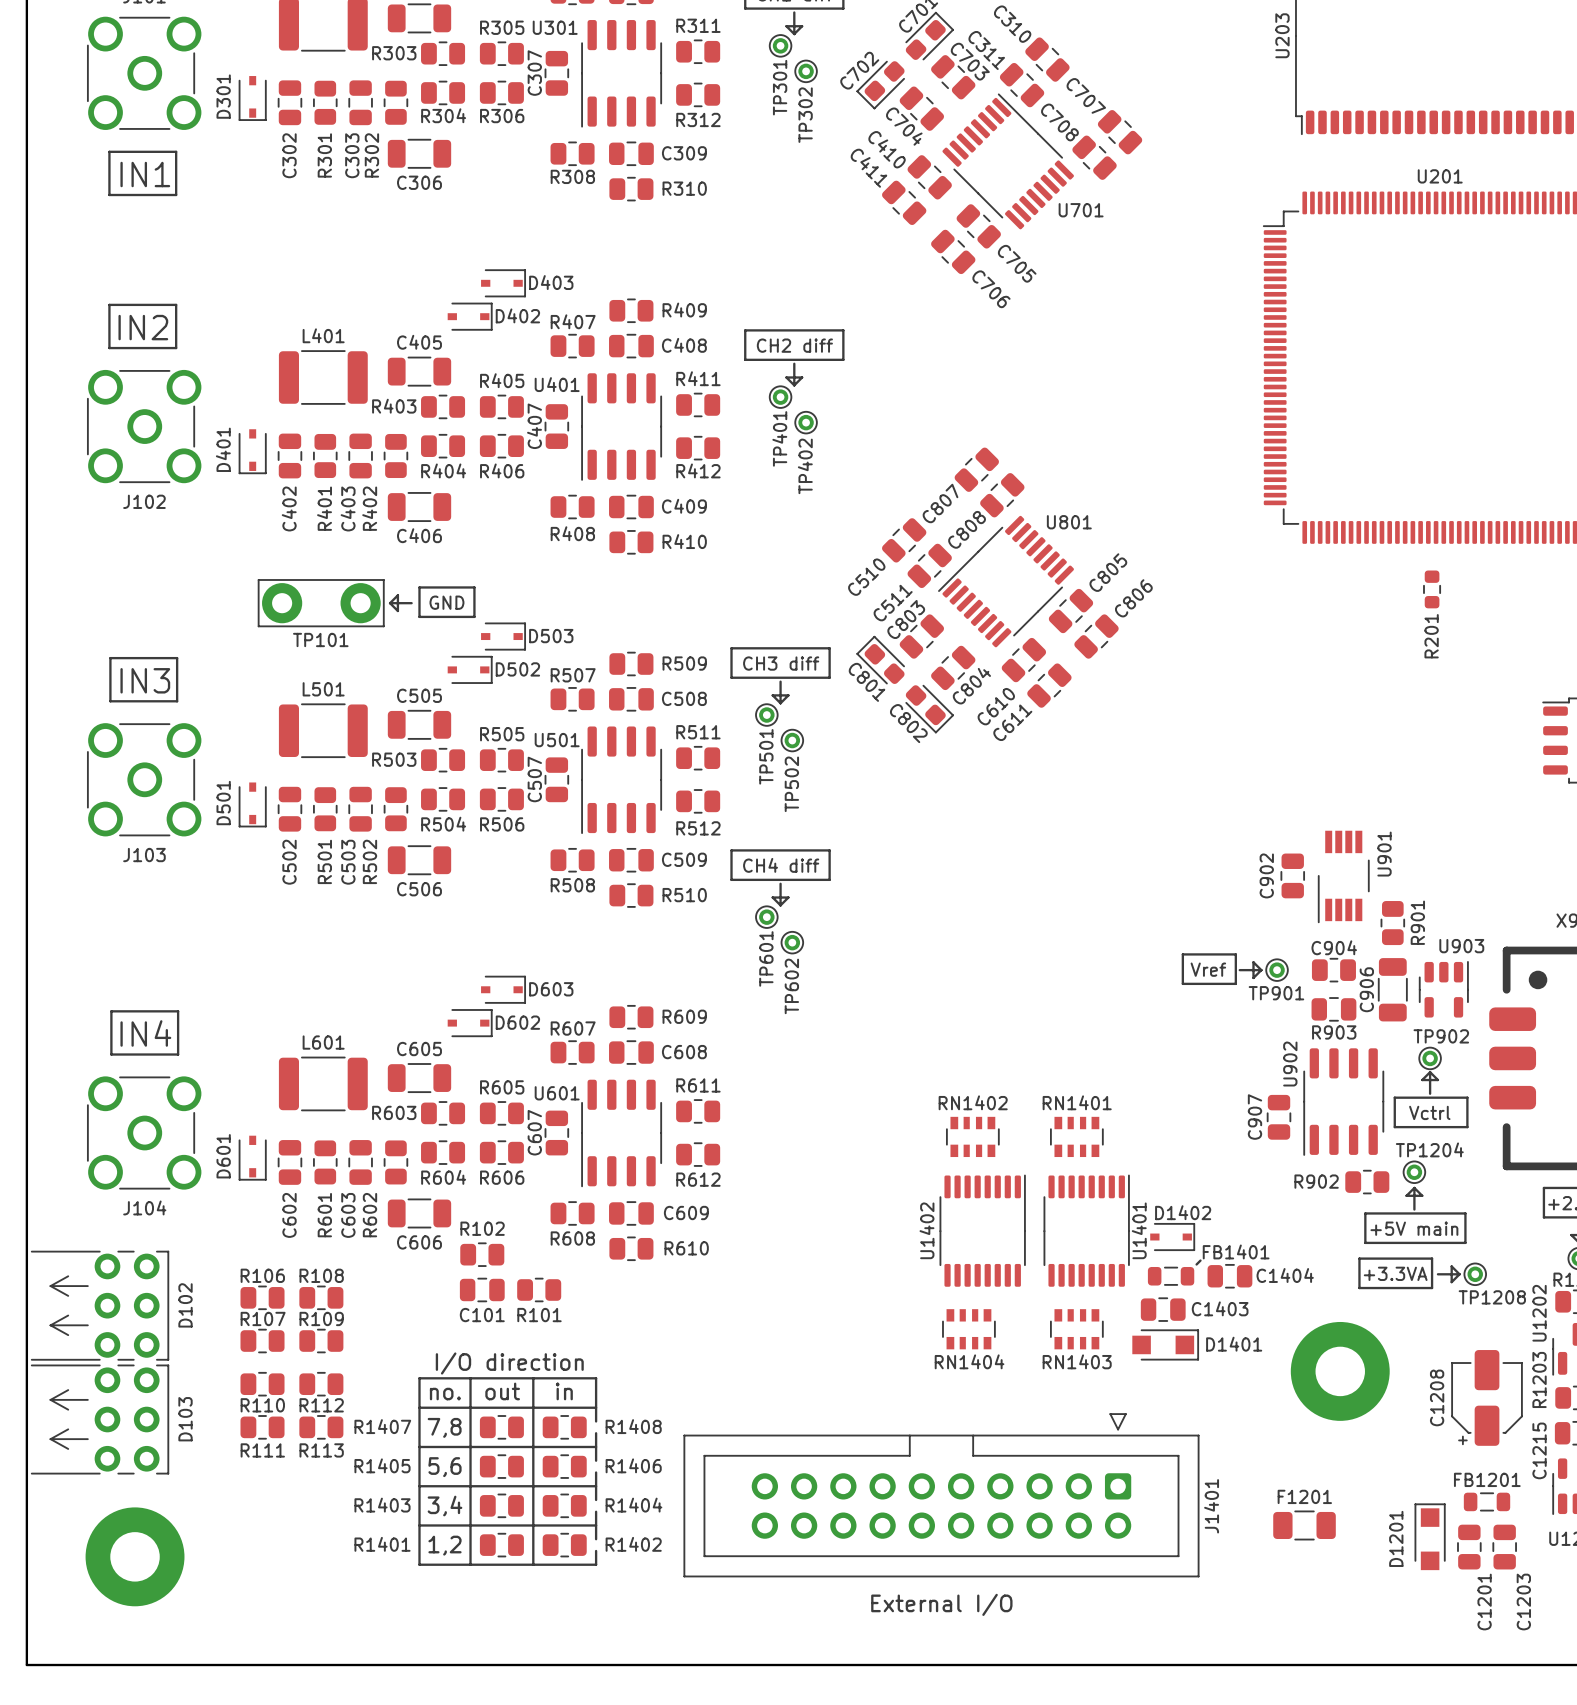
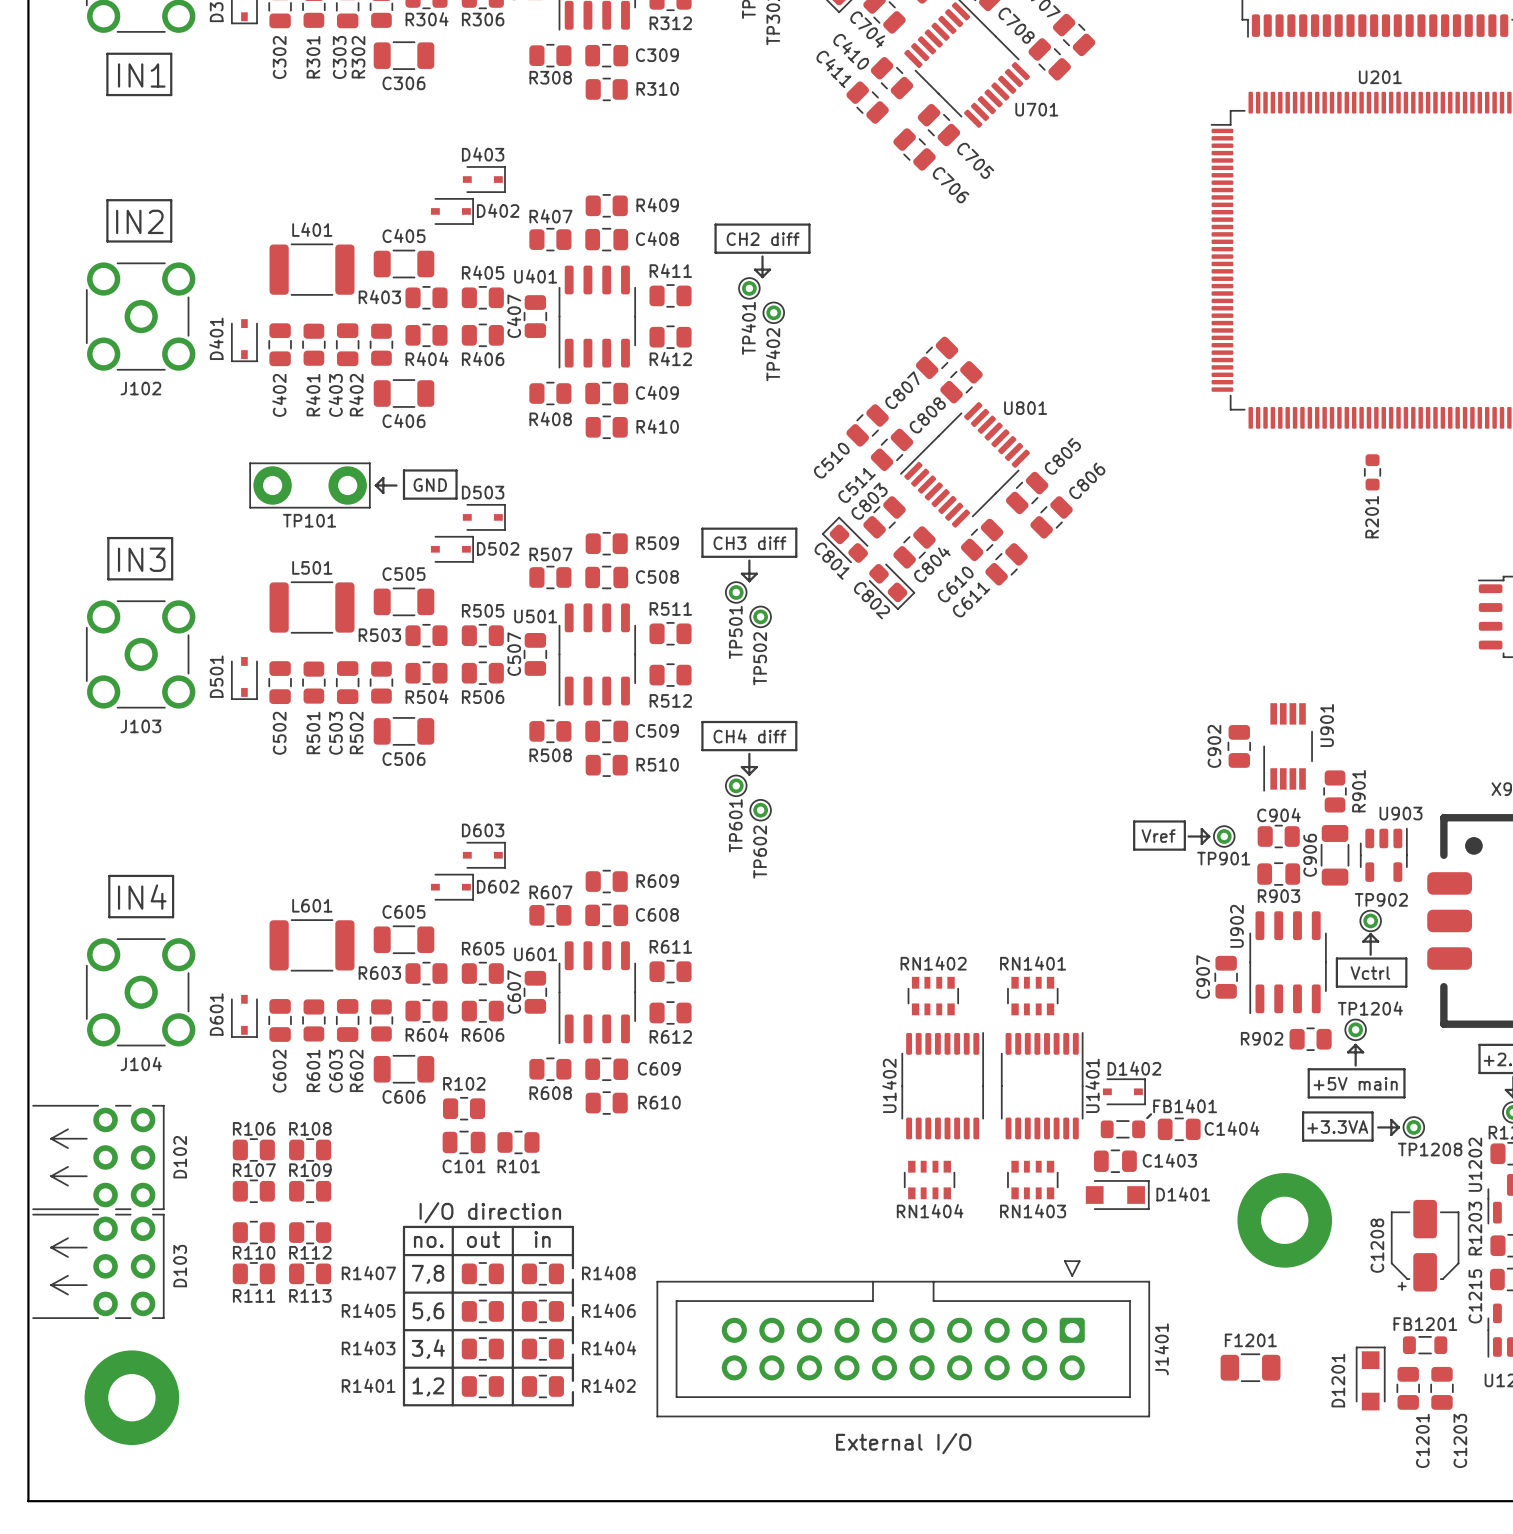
D403 name position: D403 (551, 282) -> D403 (483, 154)
D503 name position: D503 (551, 636) -> D503 (483, 492)
D603 name position: D603 (551, 989) -> D603 (483, 830)

